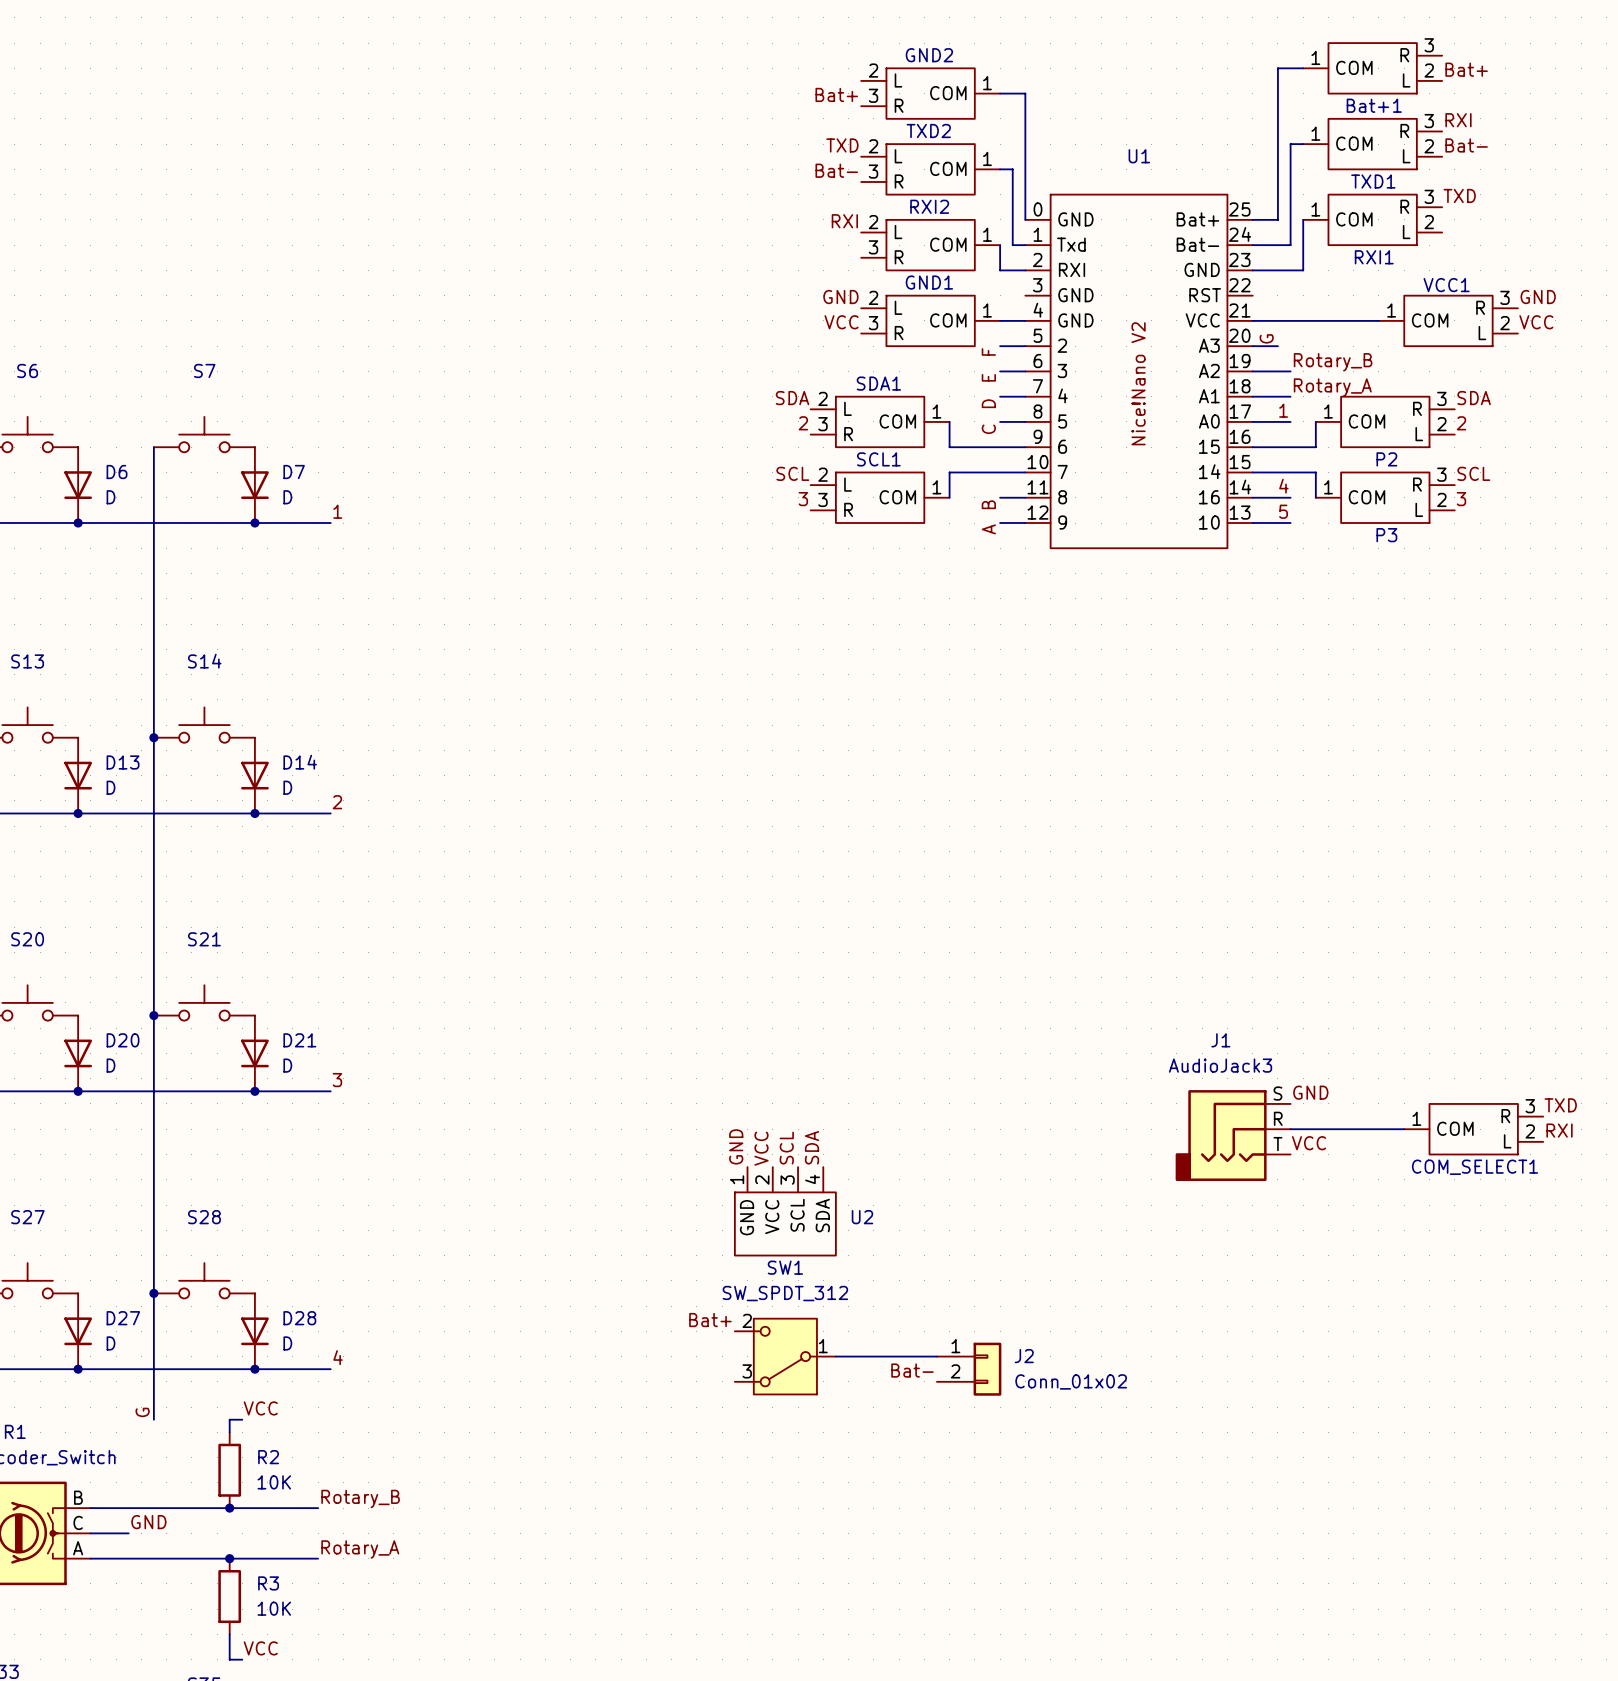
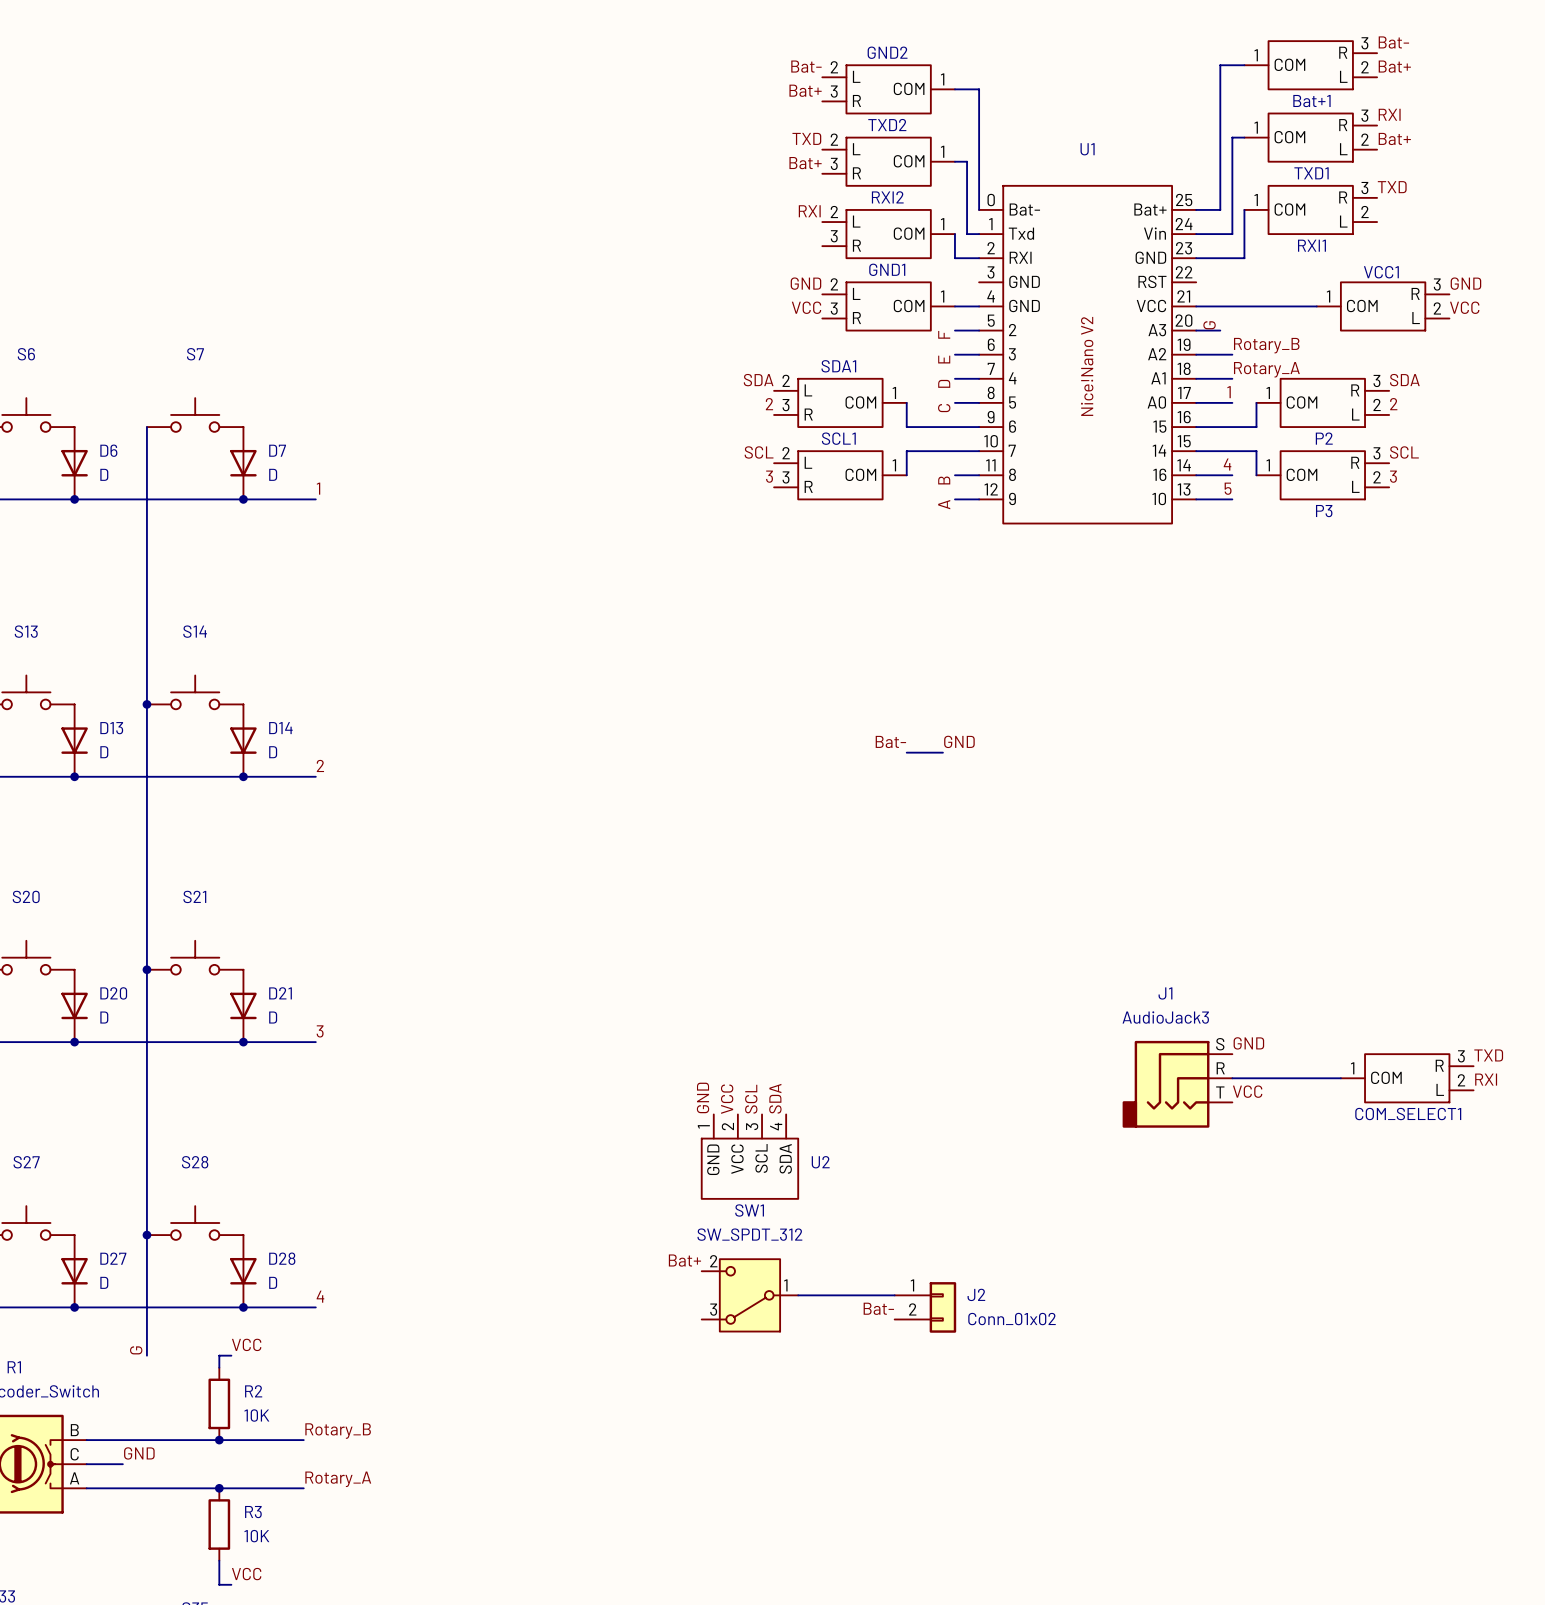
label: none -> Bat- (1393, 42)
label: none -> Bat- (806, 66)
label: Bat- (1466, 145) -> Bat+ (1394, 138)
label: Bat- (836, 170) -> Bat+ (805, 163)
U1 pin name: GND (1075, 219) -> Bat- (1024, 209)
U1 pin name: Bat- (1197, 244) -> Vin (1154, 233)
label: none -> Bat- (890, 741)
label: none -> GND (959, 741)
wire: none -> (906, 752) (942, 752)

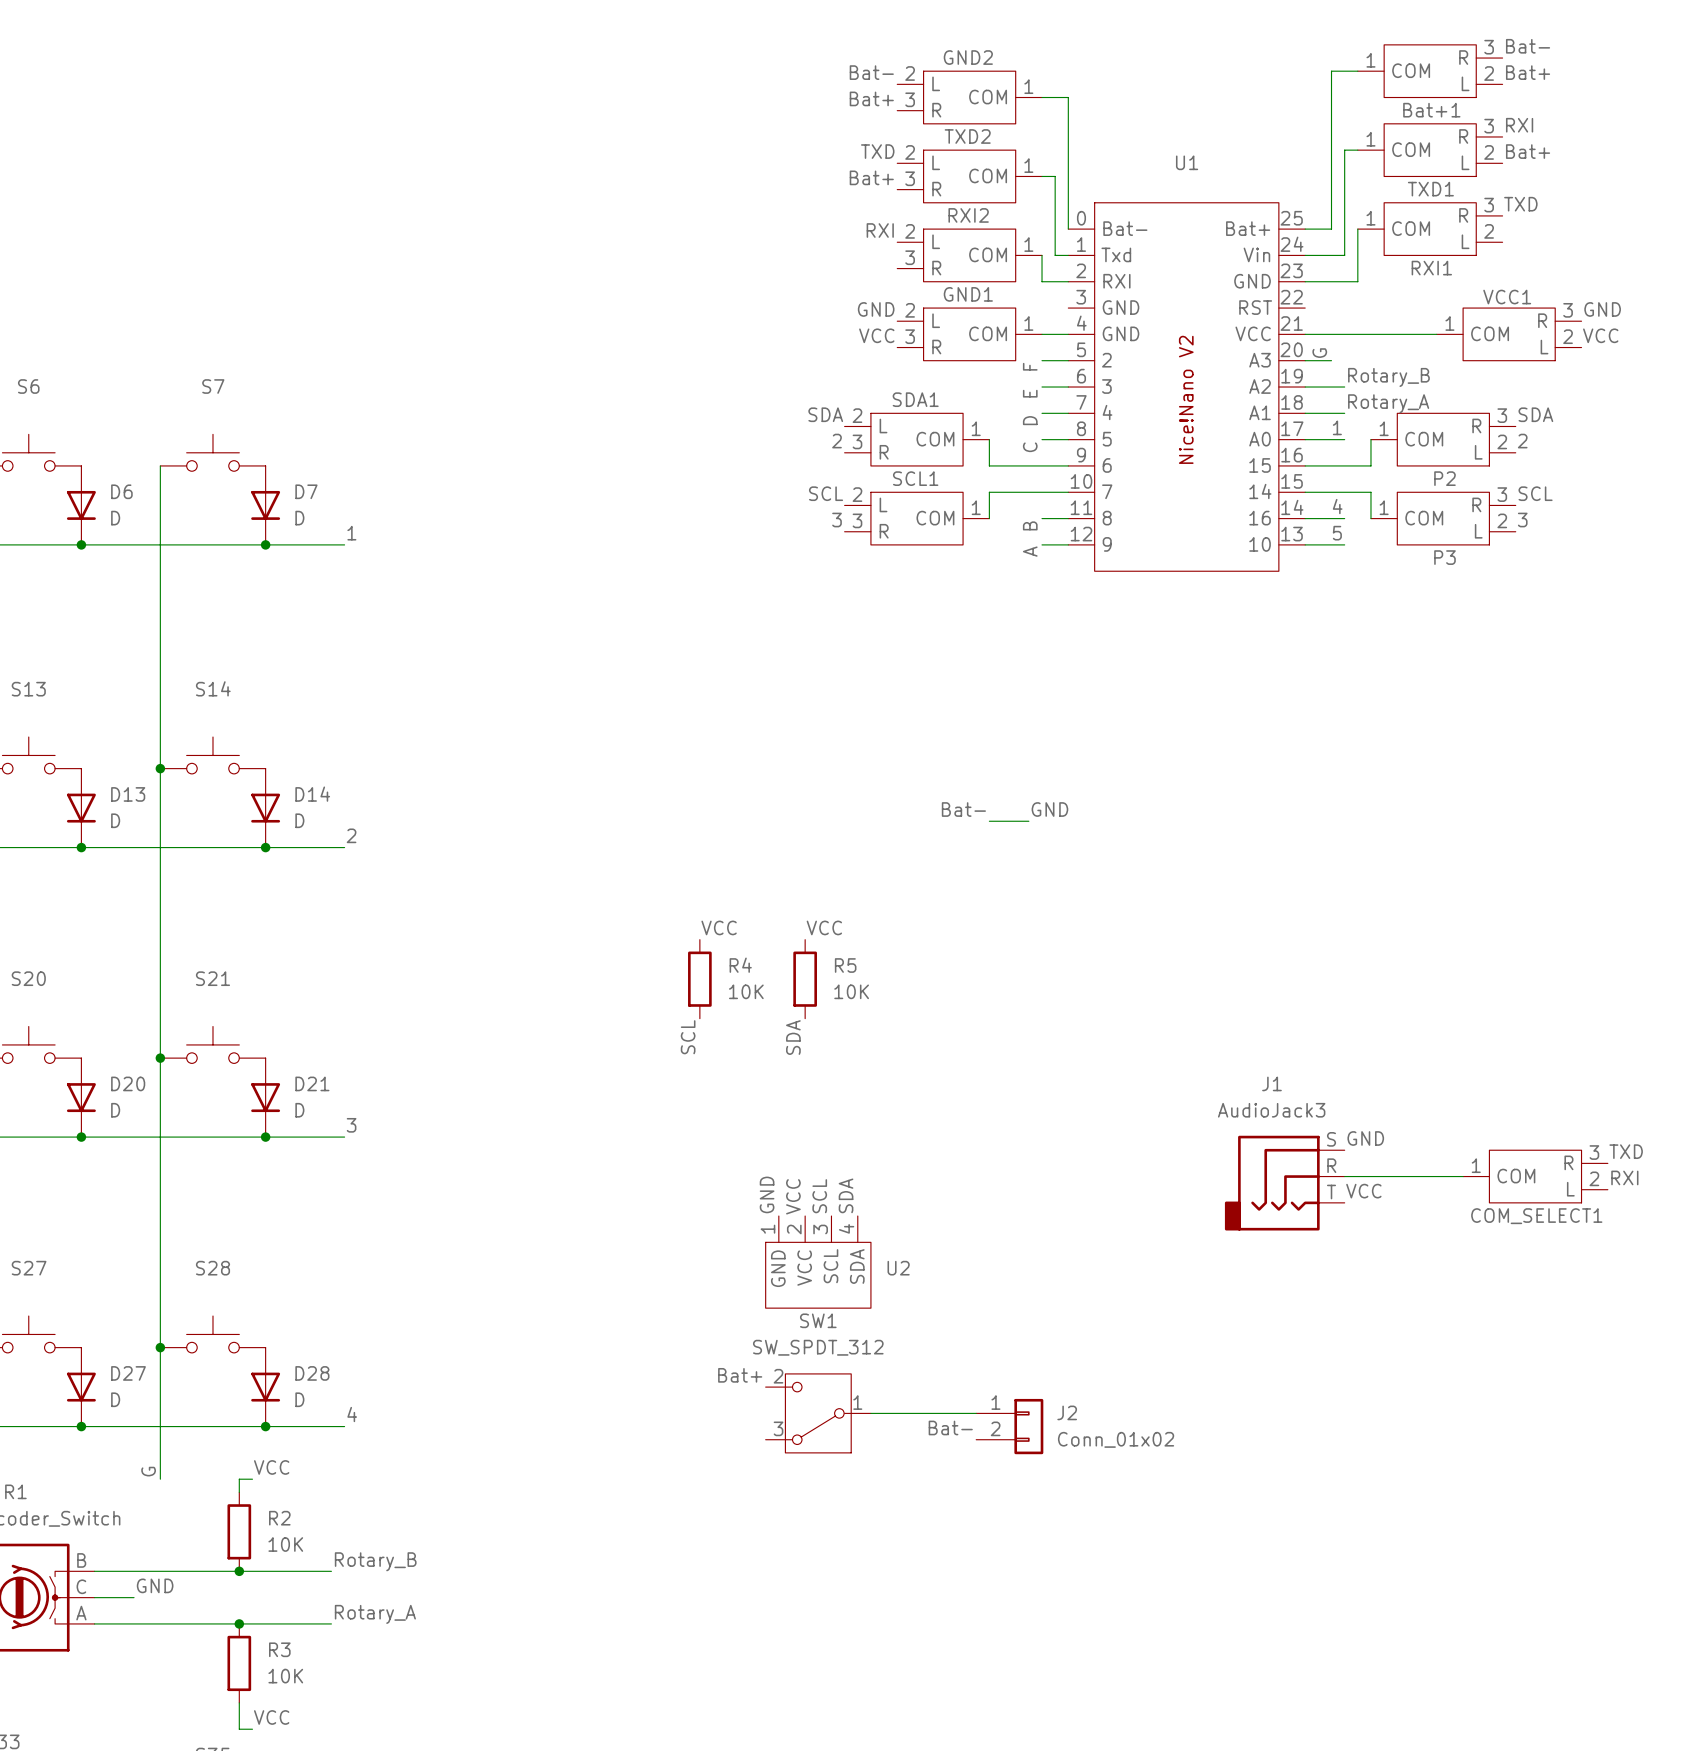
label: none -> VCC (719, 927)
label: none -> VCC (824, 927)
R4: none -> 10K (699, 979)
R5: none -> 10K (805, 979)
label: none -> SCL (688, 1037)
label: none -> SDA (793, 1037)

